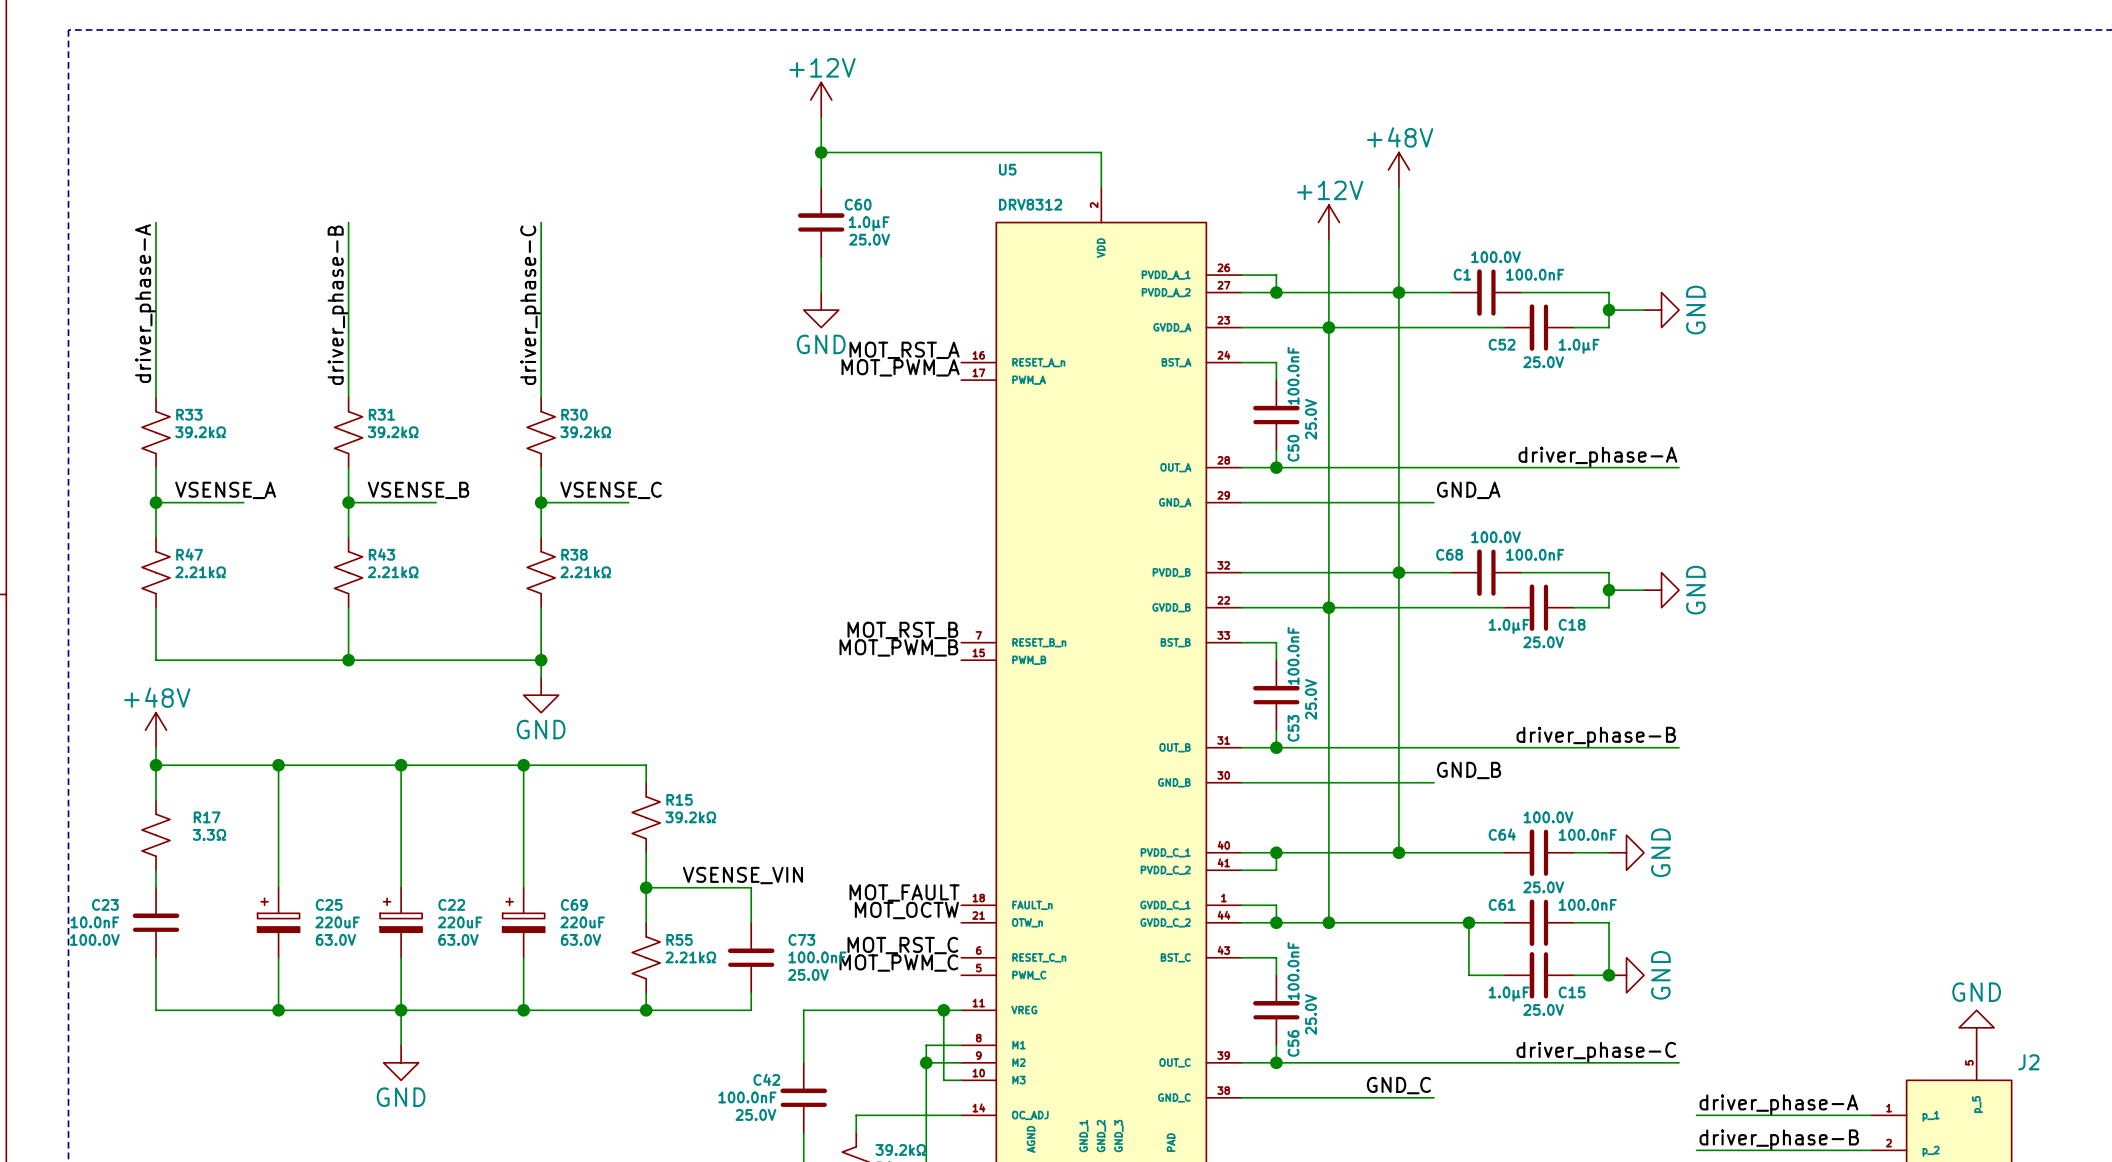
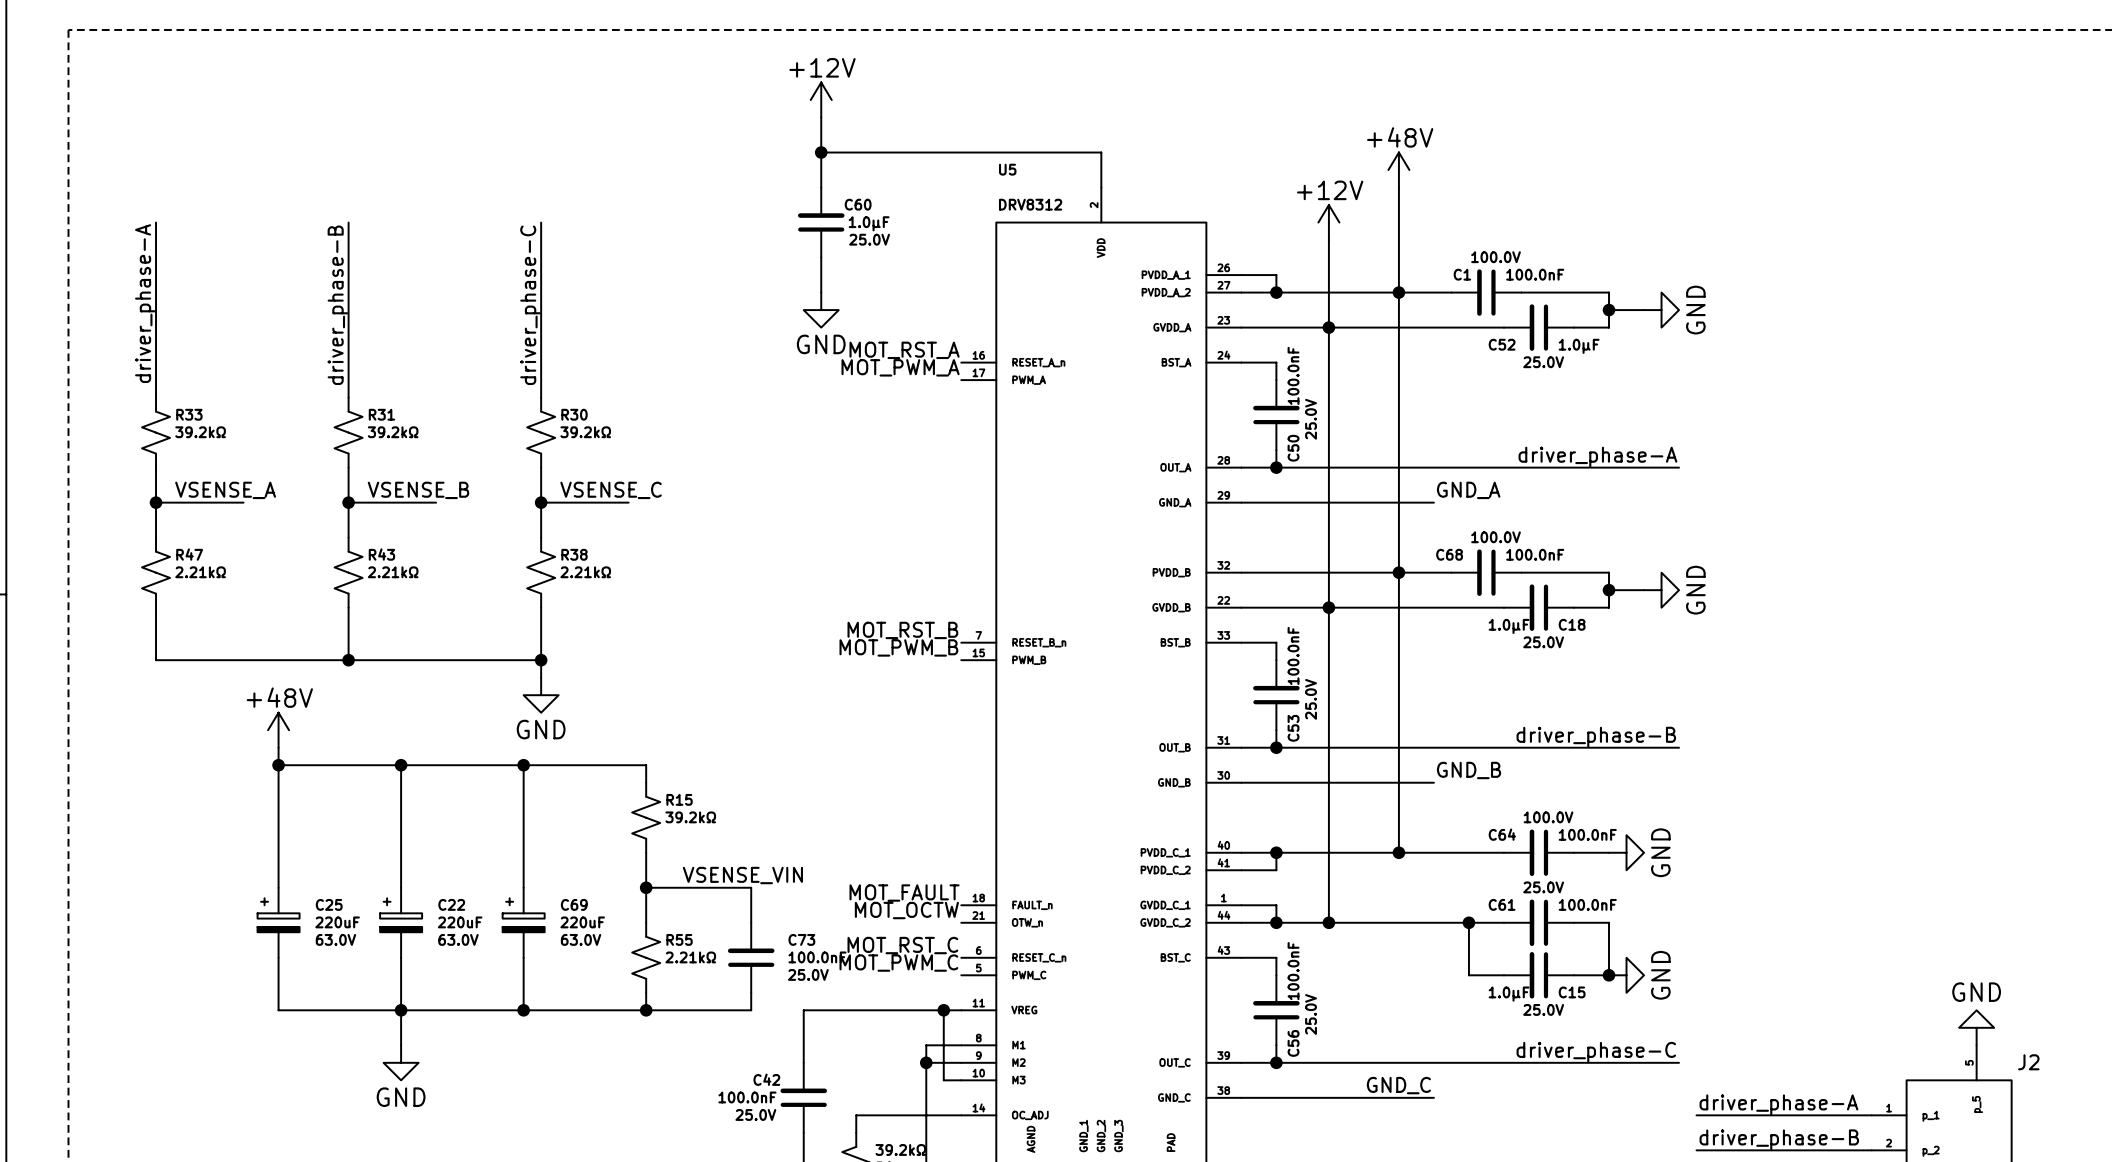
power symbol position: +48V (156, 730) -> +48V (278, 730)
wire: (156, 747) (156, 800) -> none
wire: (156, 765) (278, 765) -> (278, 747) (278, 765)
junction: (156, 765) -> none
R17: 3.3Ω (156, 835) -> none
wire: (156, 870) (156, 887) -> none
C23: 10.0nF (156, 922) -> none
wire: (156, 957) (156, 1010) (278, 1010) -> none
junction: (278, 1010) -> none

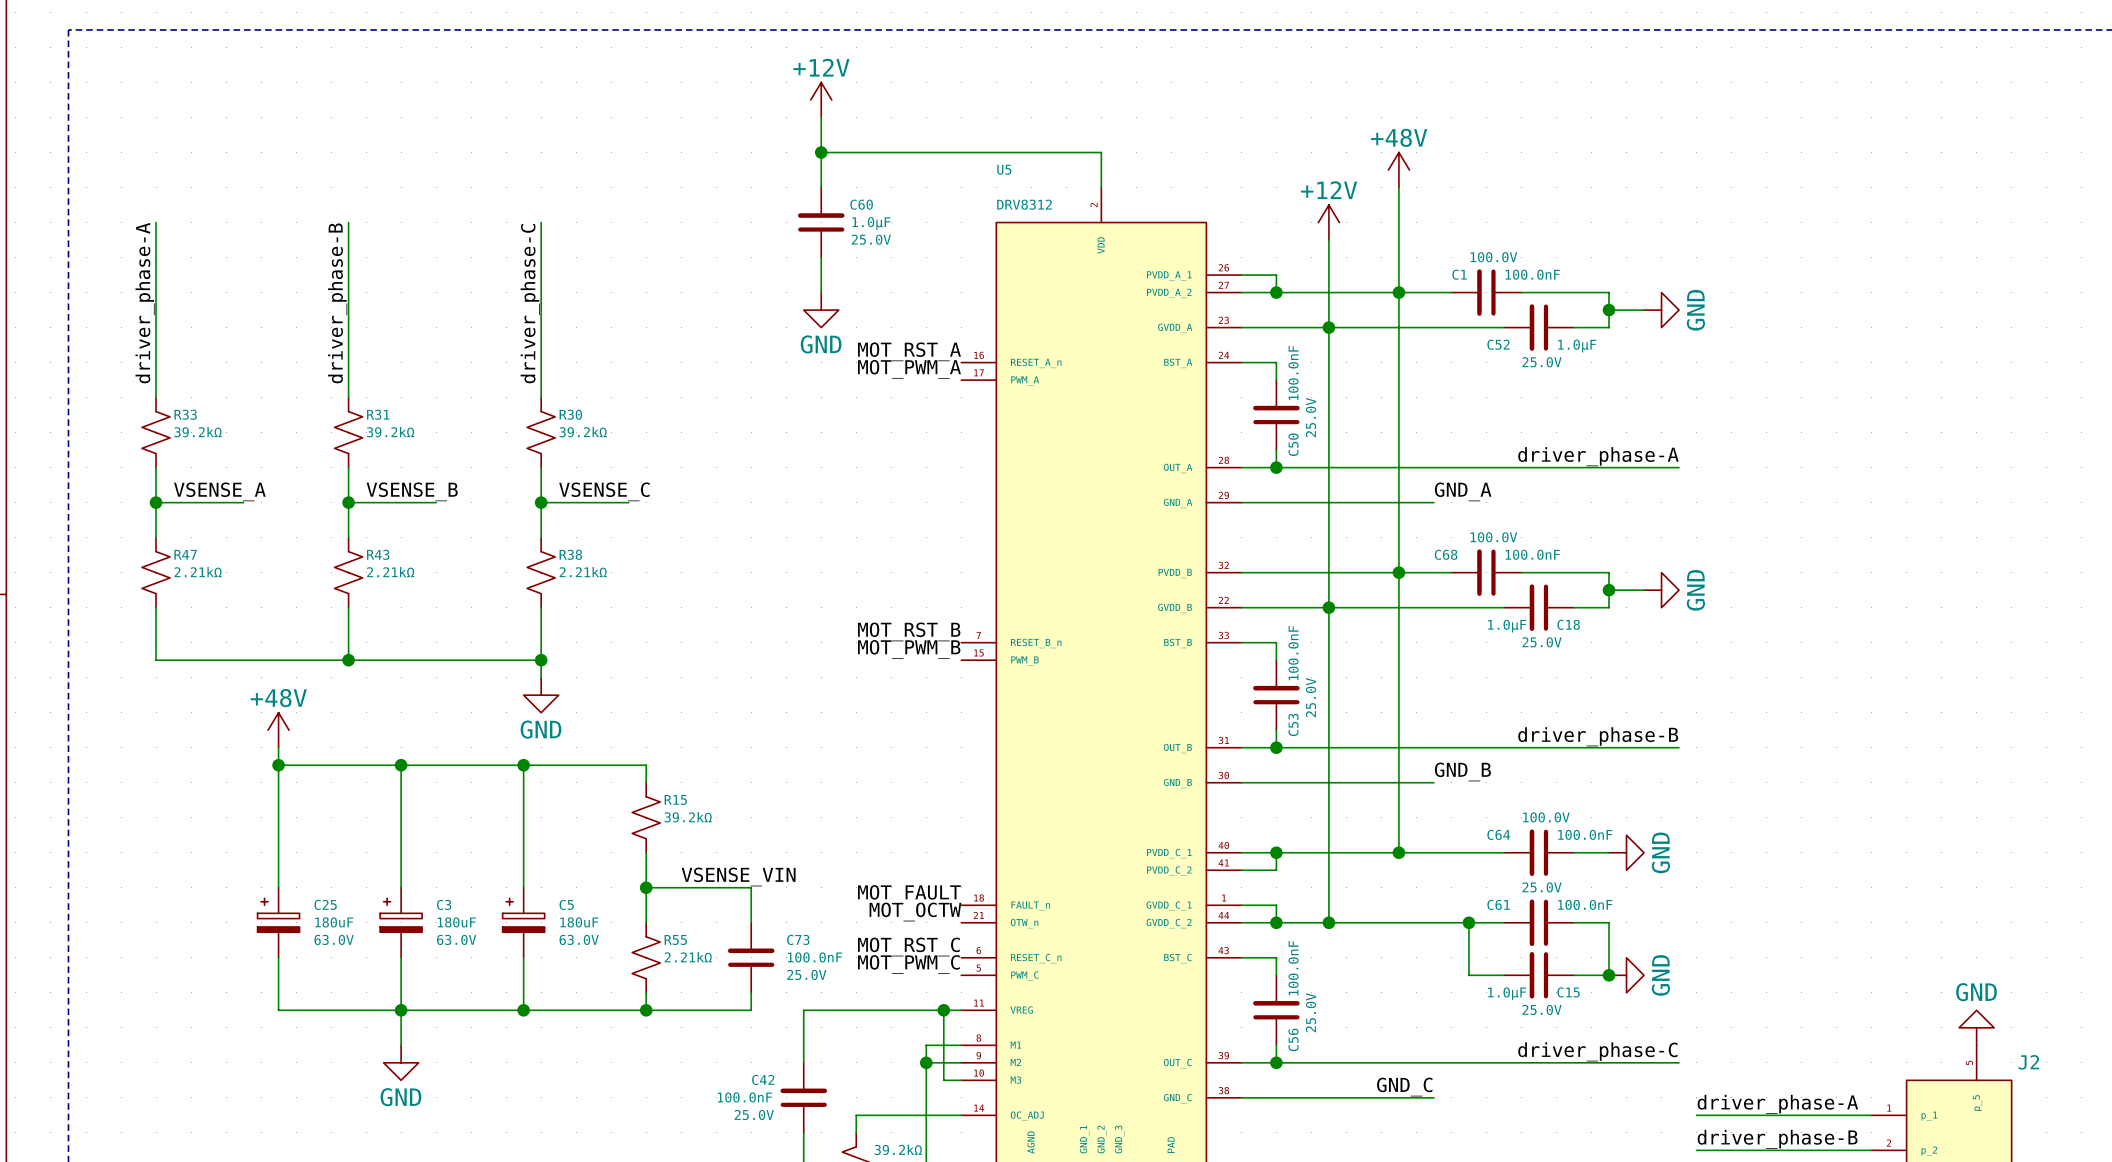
C22 name: C22 (451, 904) -> C3 (444, 904)
C69 name: C69 (574, 904) -> C5 (566, 904)
C25 value: 220uF (337, 922) -> 180uF (334, 922)
C22 value: 220uF (460, 922) -> 180uF (456, 922)
C69 value: 220uF (582, 922) -> 180uF (579, 922)

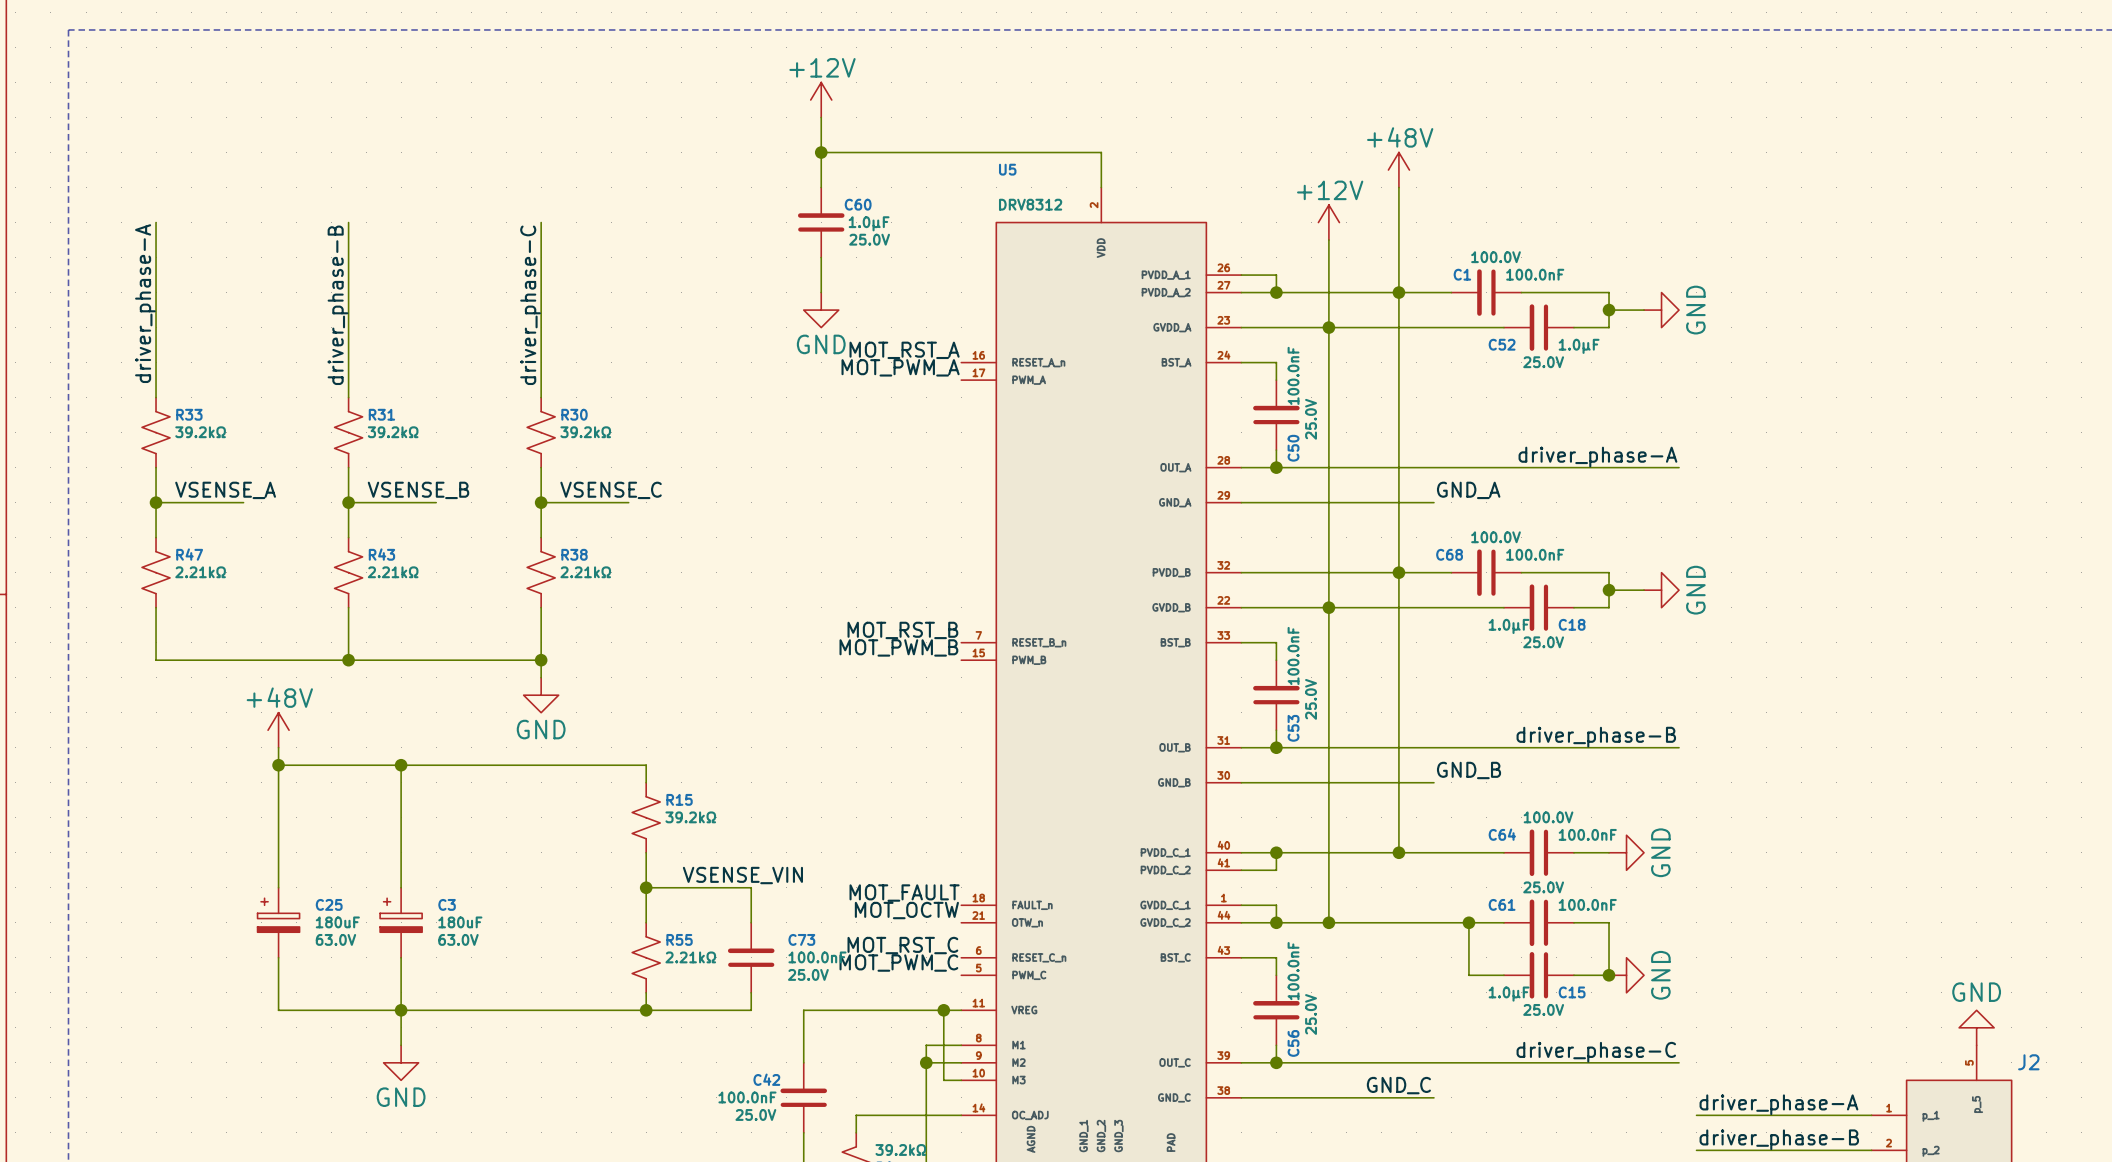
wire: (523, 765) (523, 887) -> none
junction: (523, 765) -> none
C5: 180uF (523, 922) -> none
wire: (523, 957) (523, 1010) -> none
junction: (523, 1010) -> none

